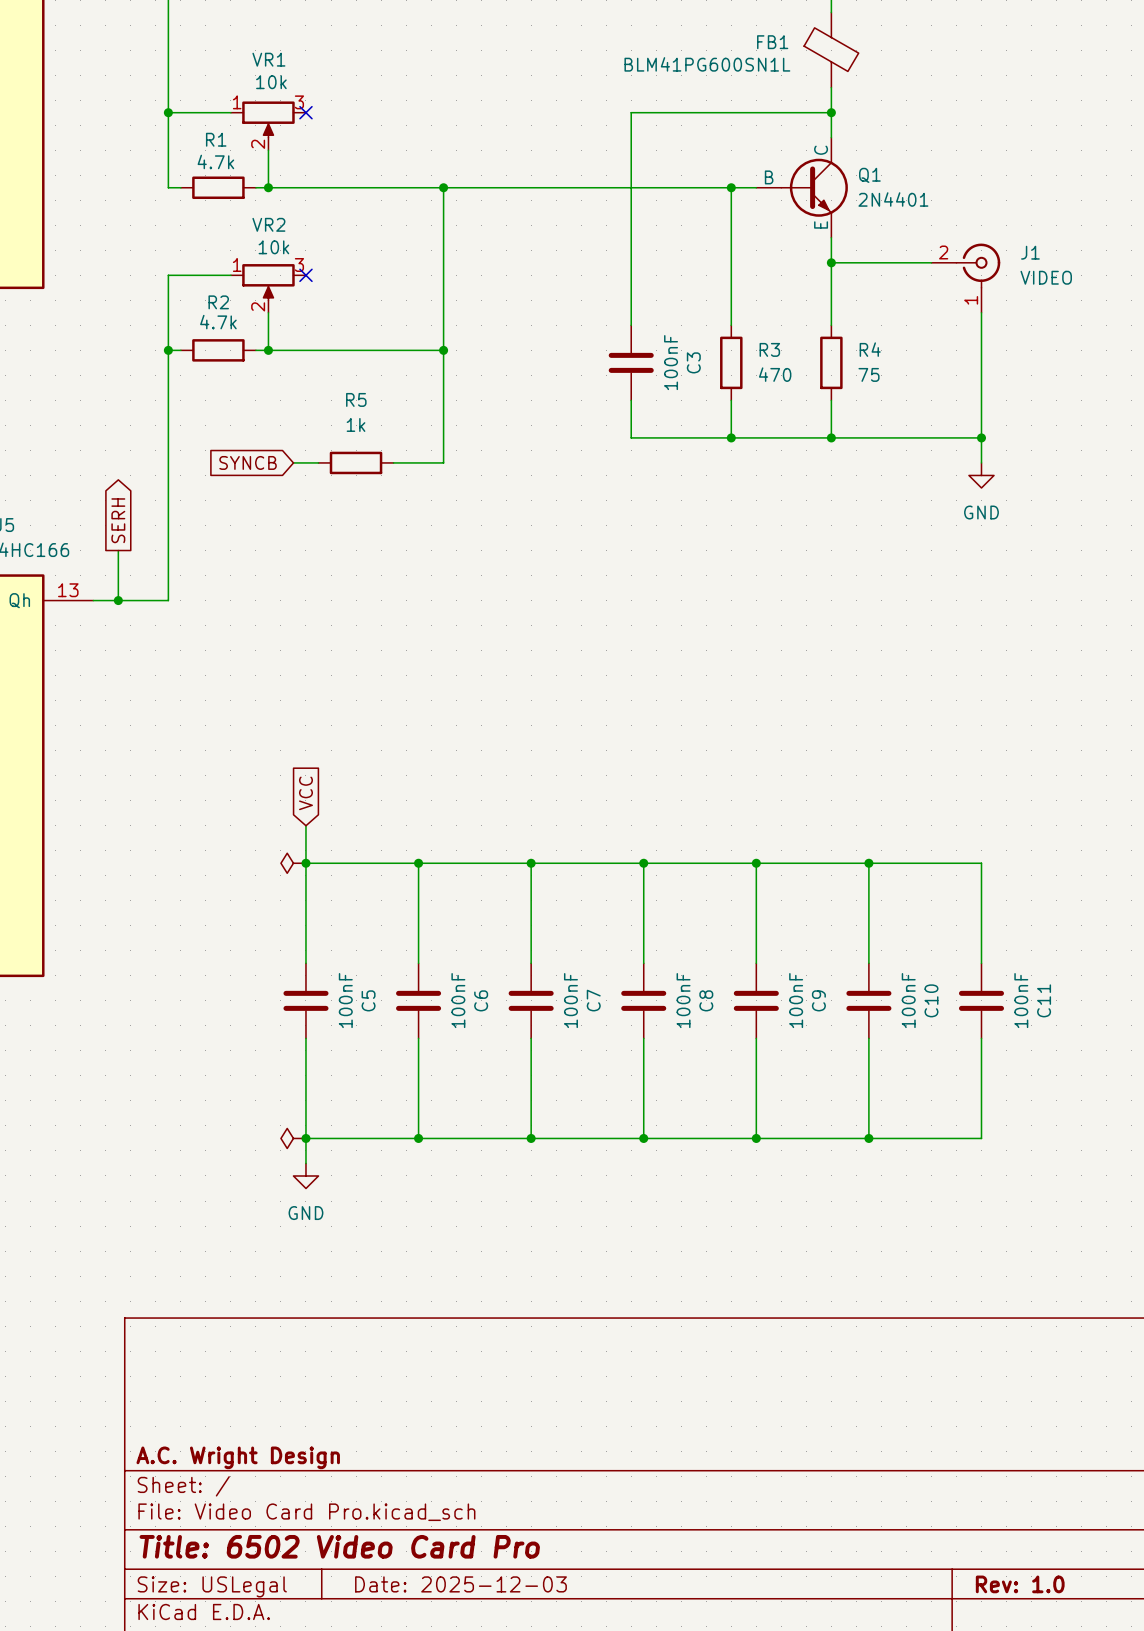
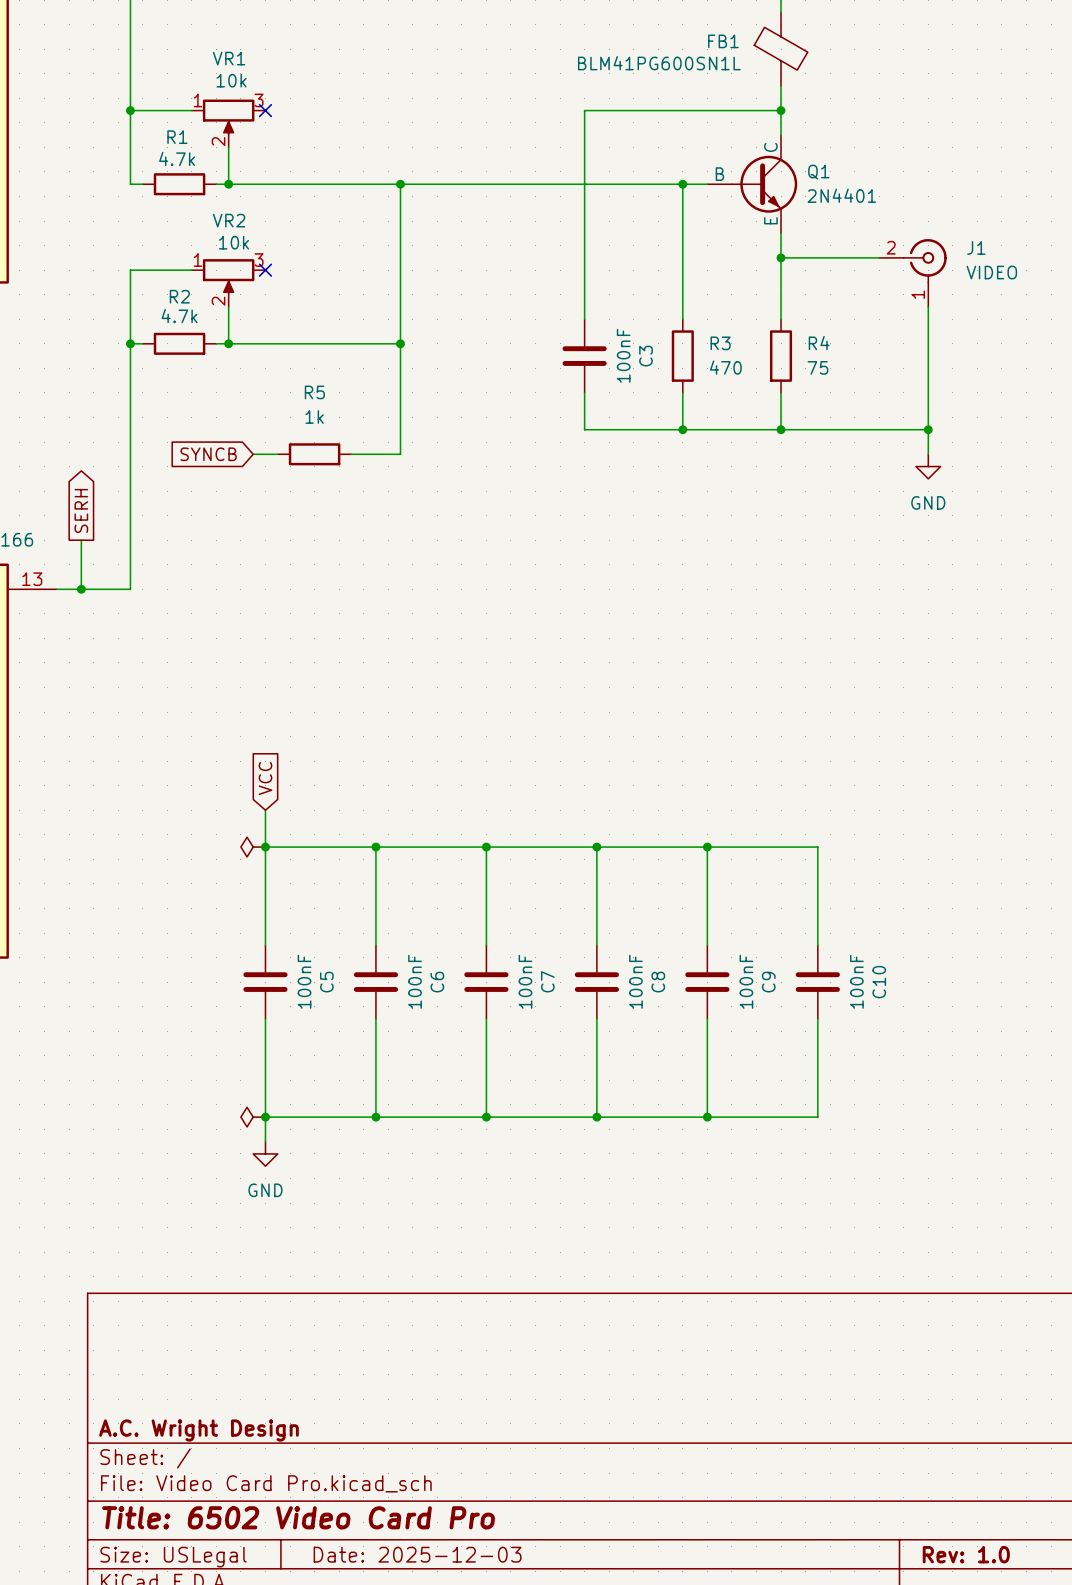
wire: (868, 863) (981, 863) (981, 963) -> none
junction: (868, 863) -> none
C11: 100nF (981, 1000) -> none
wire: (981, 1038) (981, 1138) (868, 1138) -> none
junction: (868, 1138) -> none

